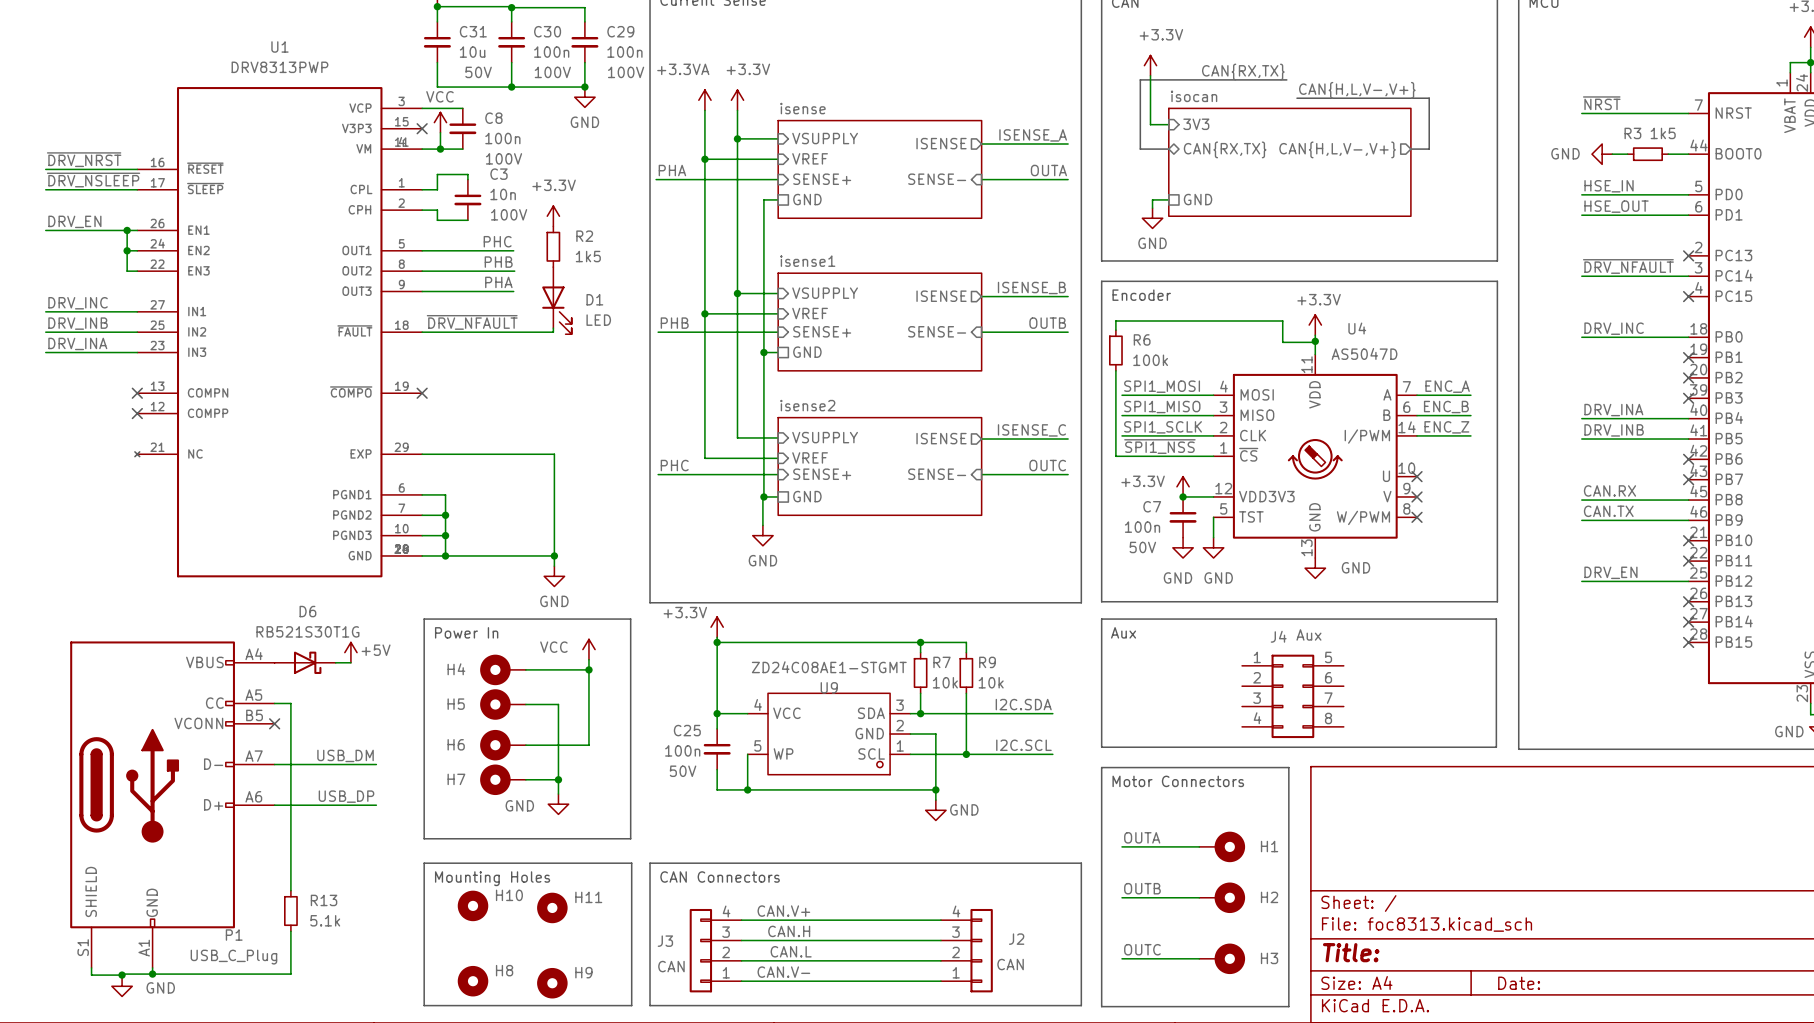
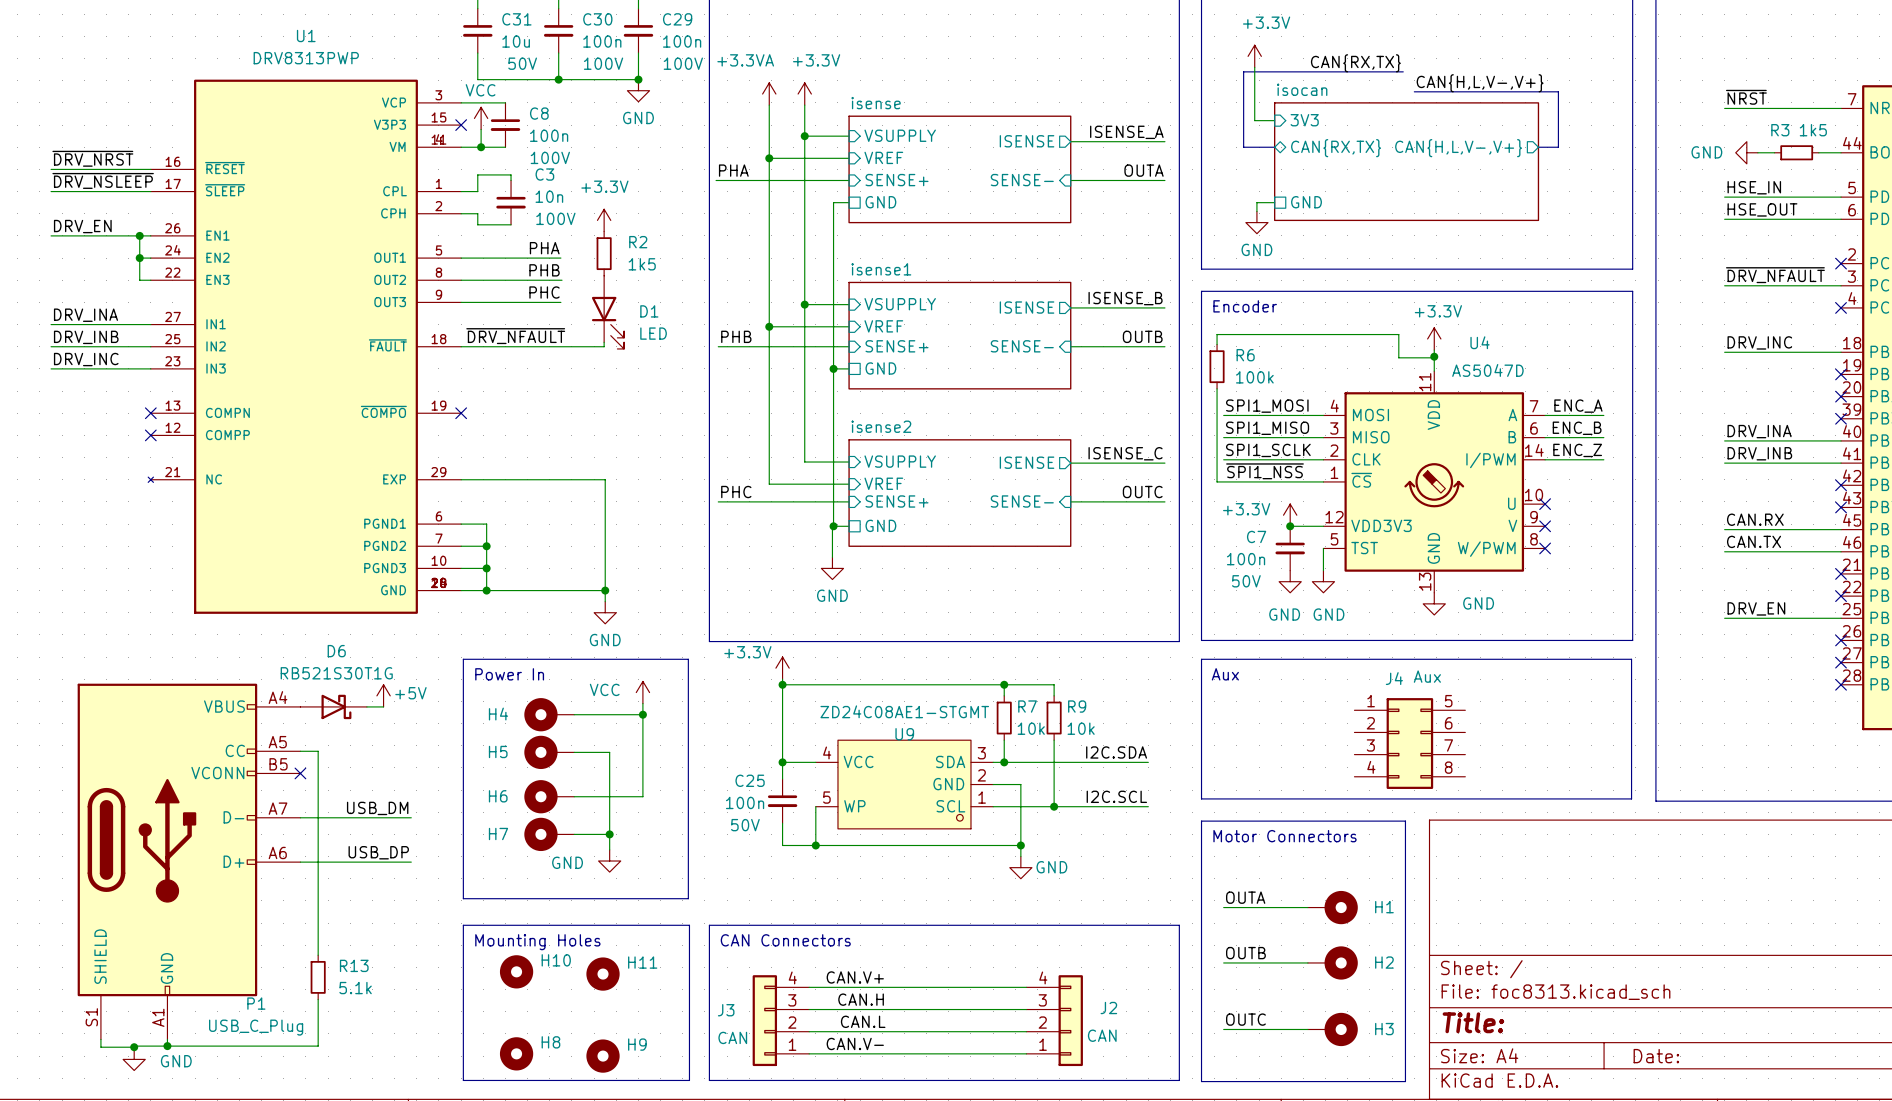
label: PHC (497, 241) -> PHA (544, 248)
label: PHA (498, 282) -> PHC (544, 292)
label: DRV_INC (78, 303) -> DRV_INA (85, 315)
label: DRV_INA (77, 343) -> DRV_INC (86, 359)

